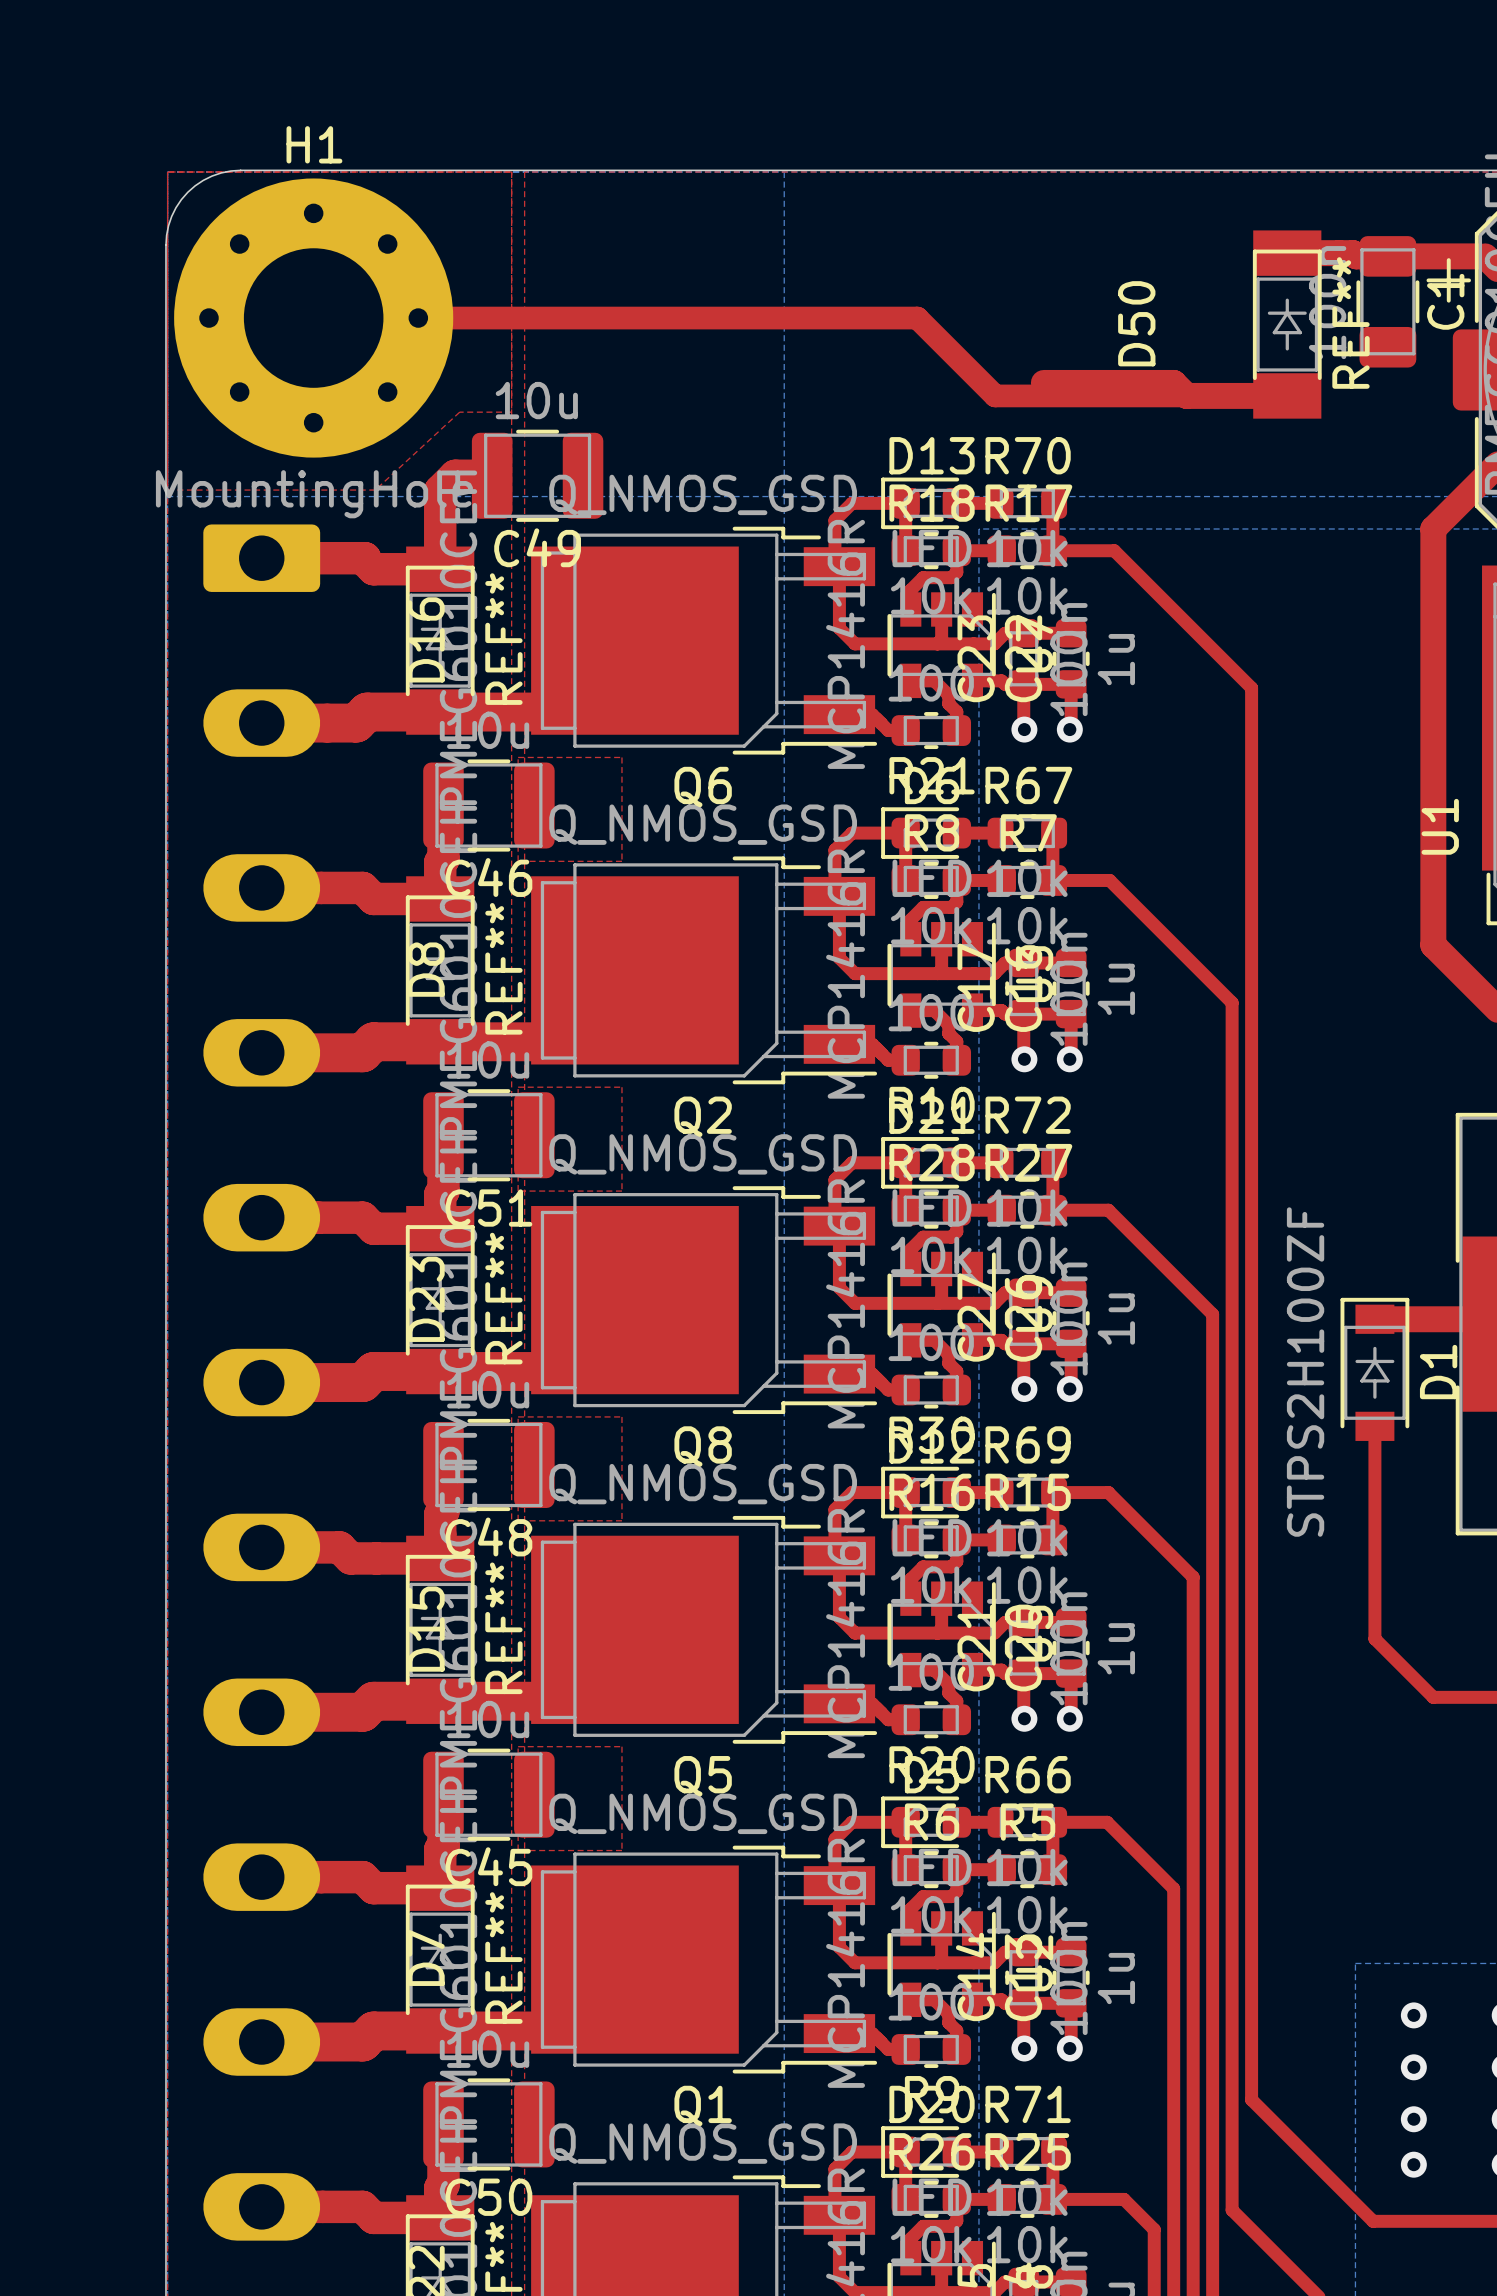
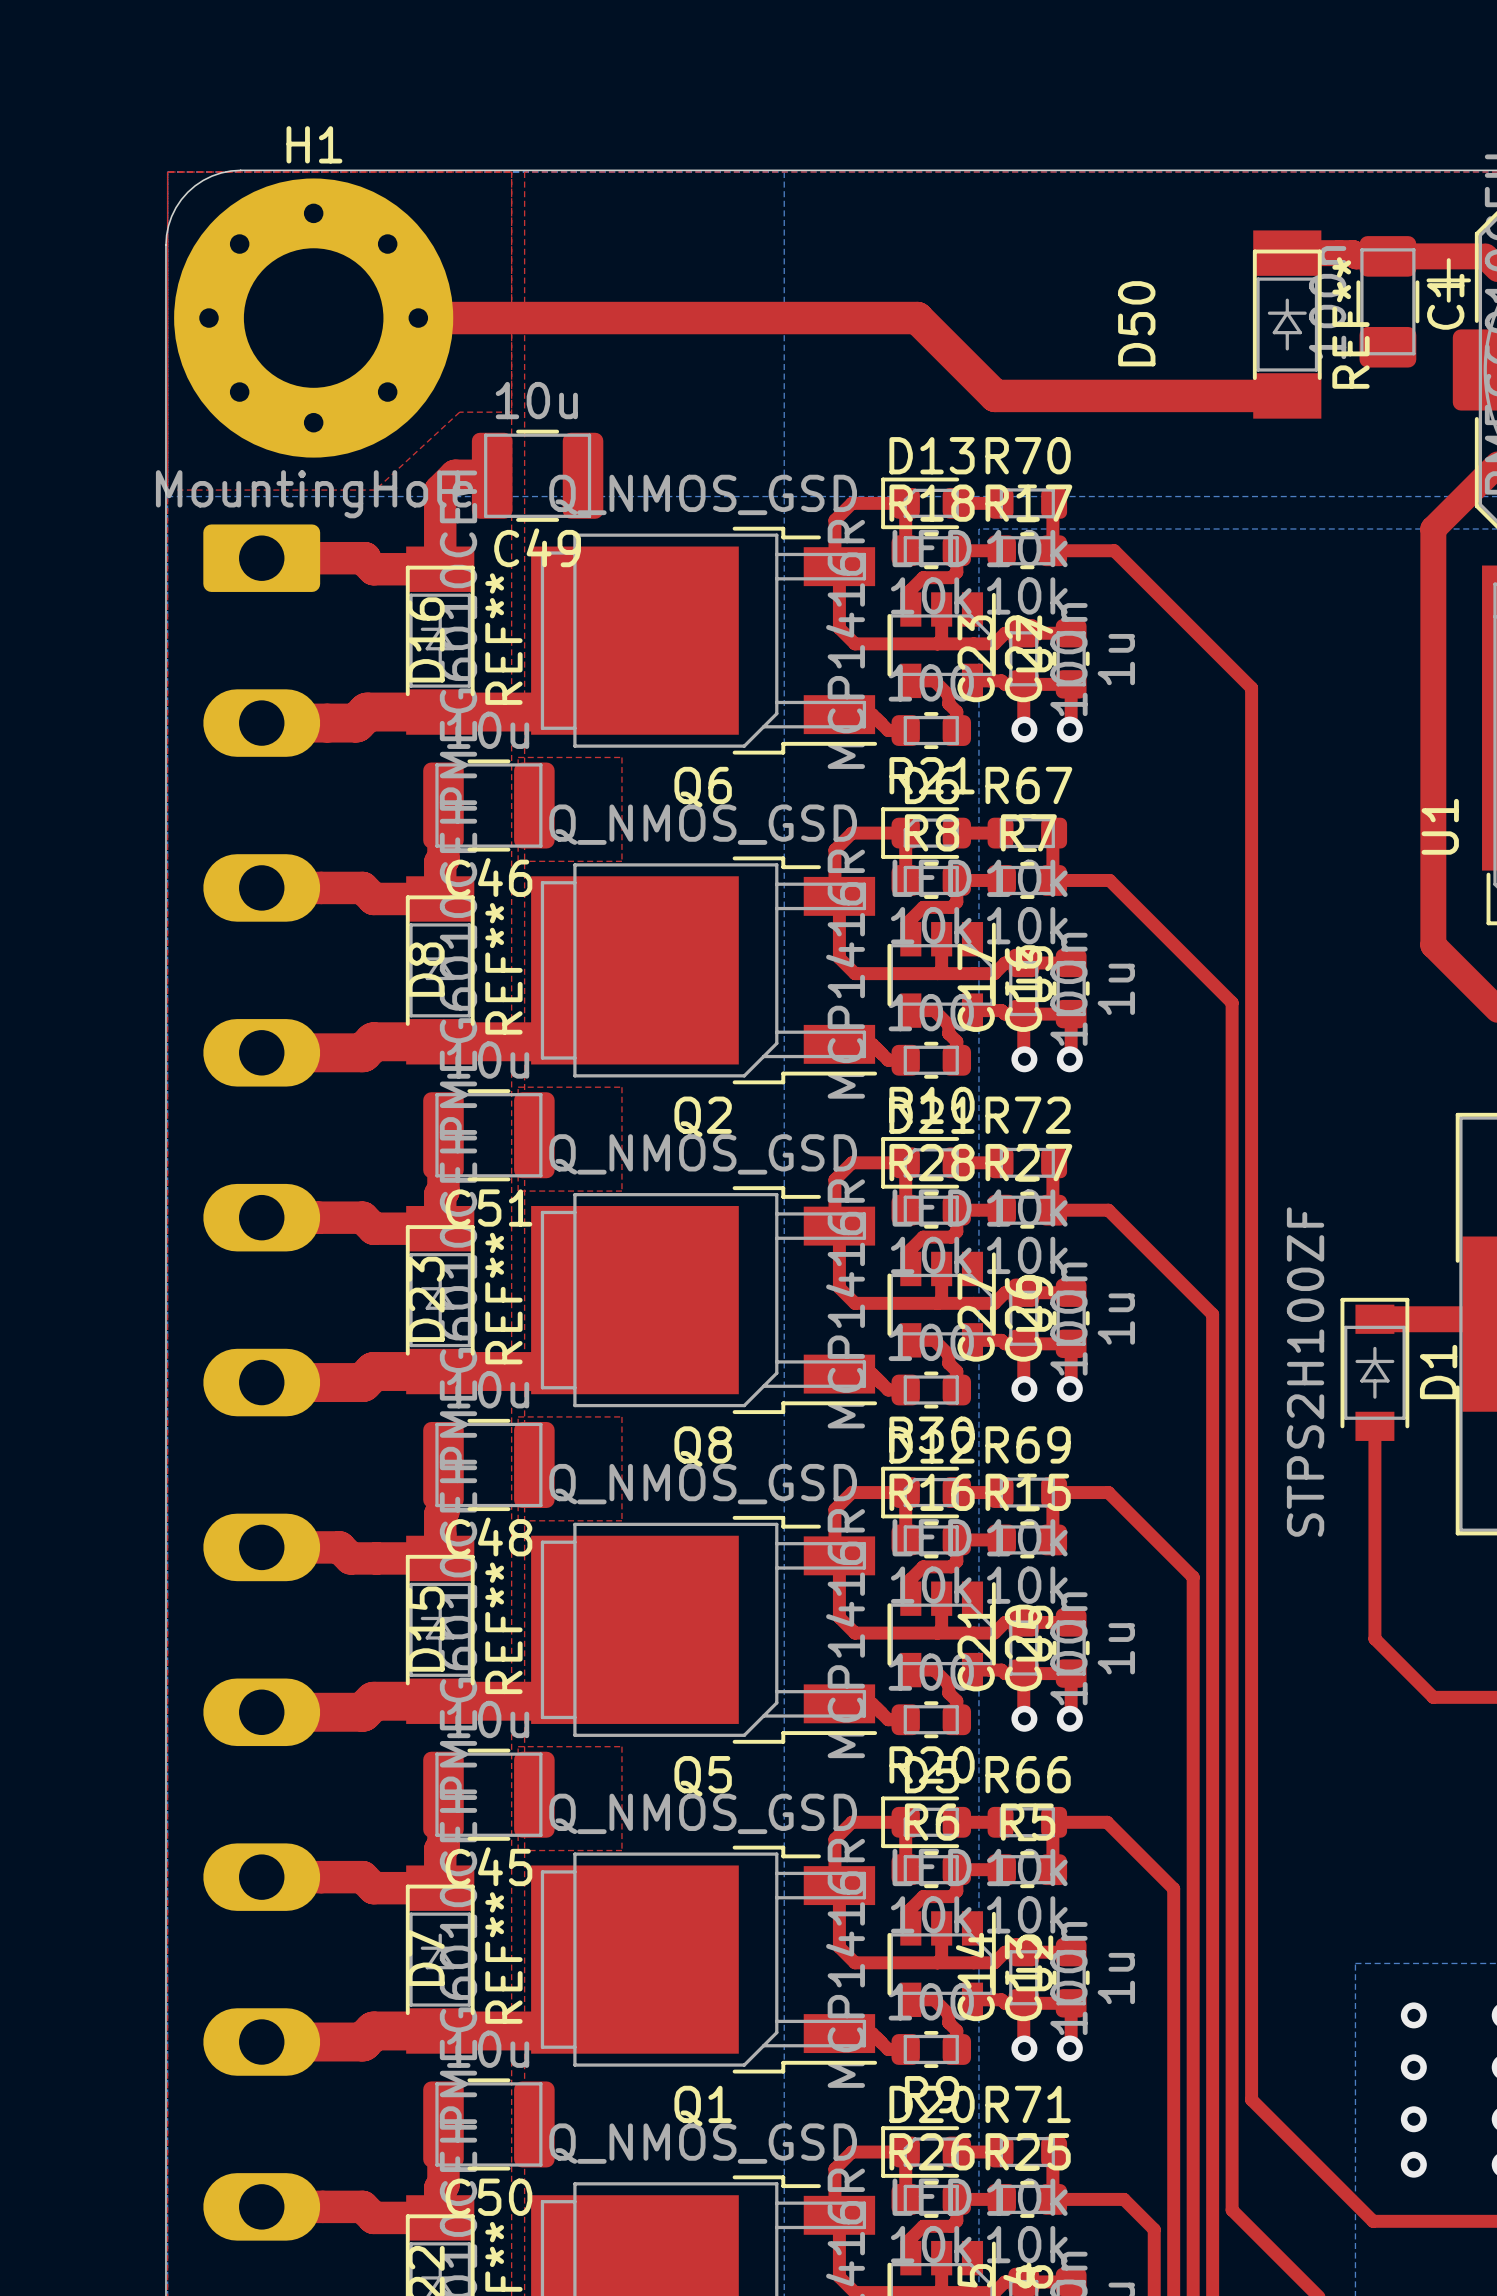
top track width: thin (313, 318) (917, 318) (995, 395) (1287, 395) (1186, 395) -> thick (313, 318) (917, 318) (995, 395) (1287, 395) (1186, 395)
top track: (1043, 382) (1173, 382) (1186, 395) -> none

